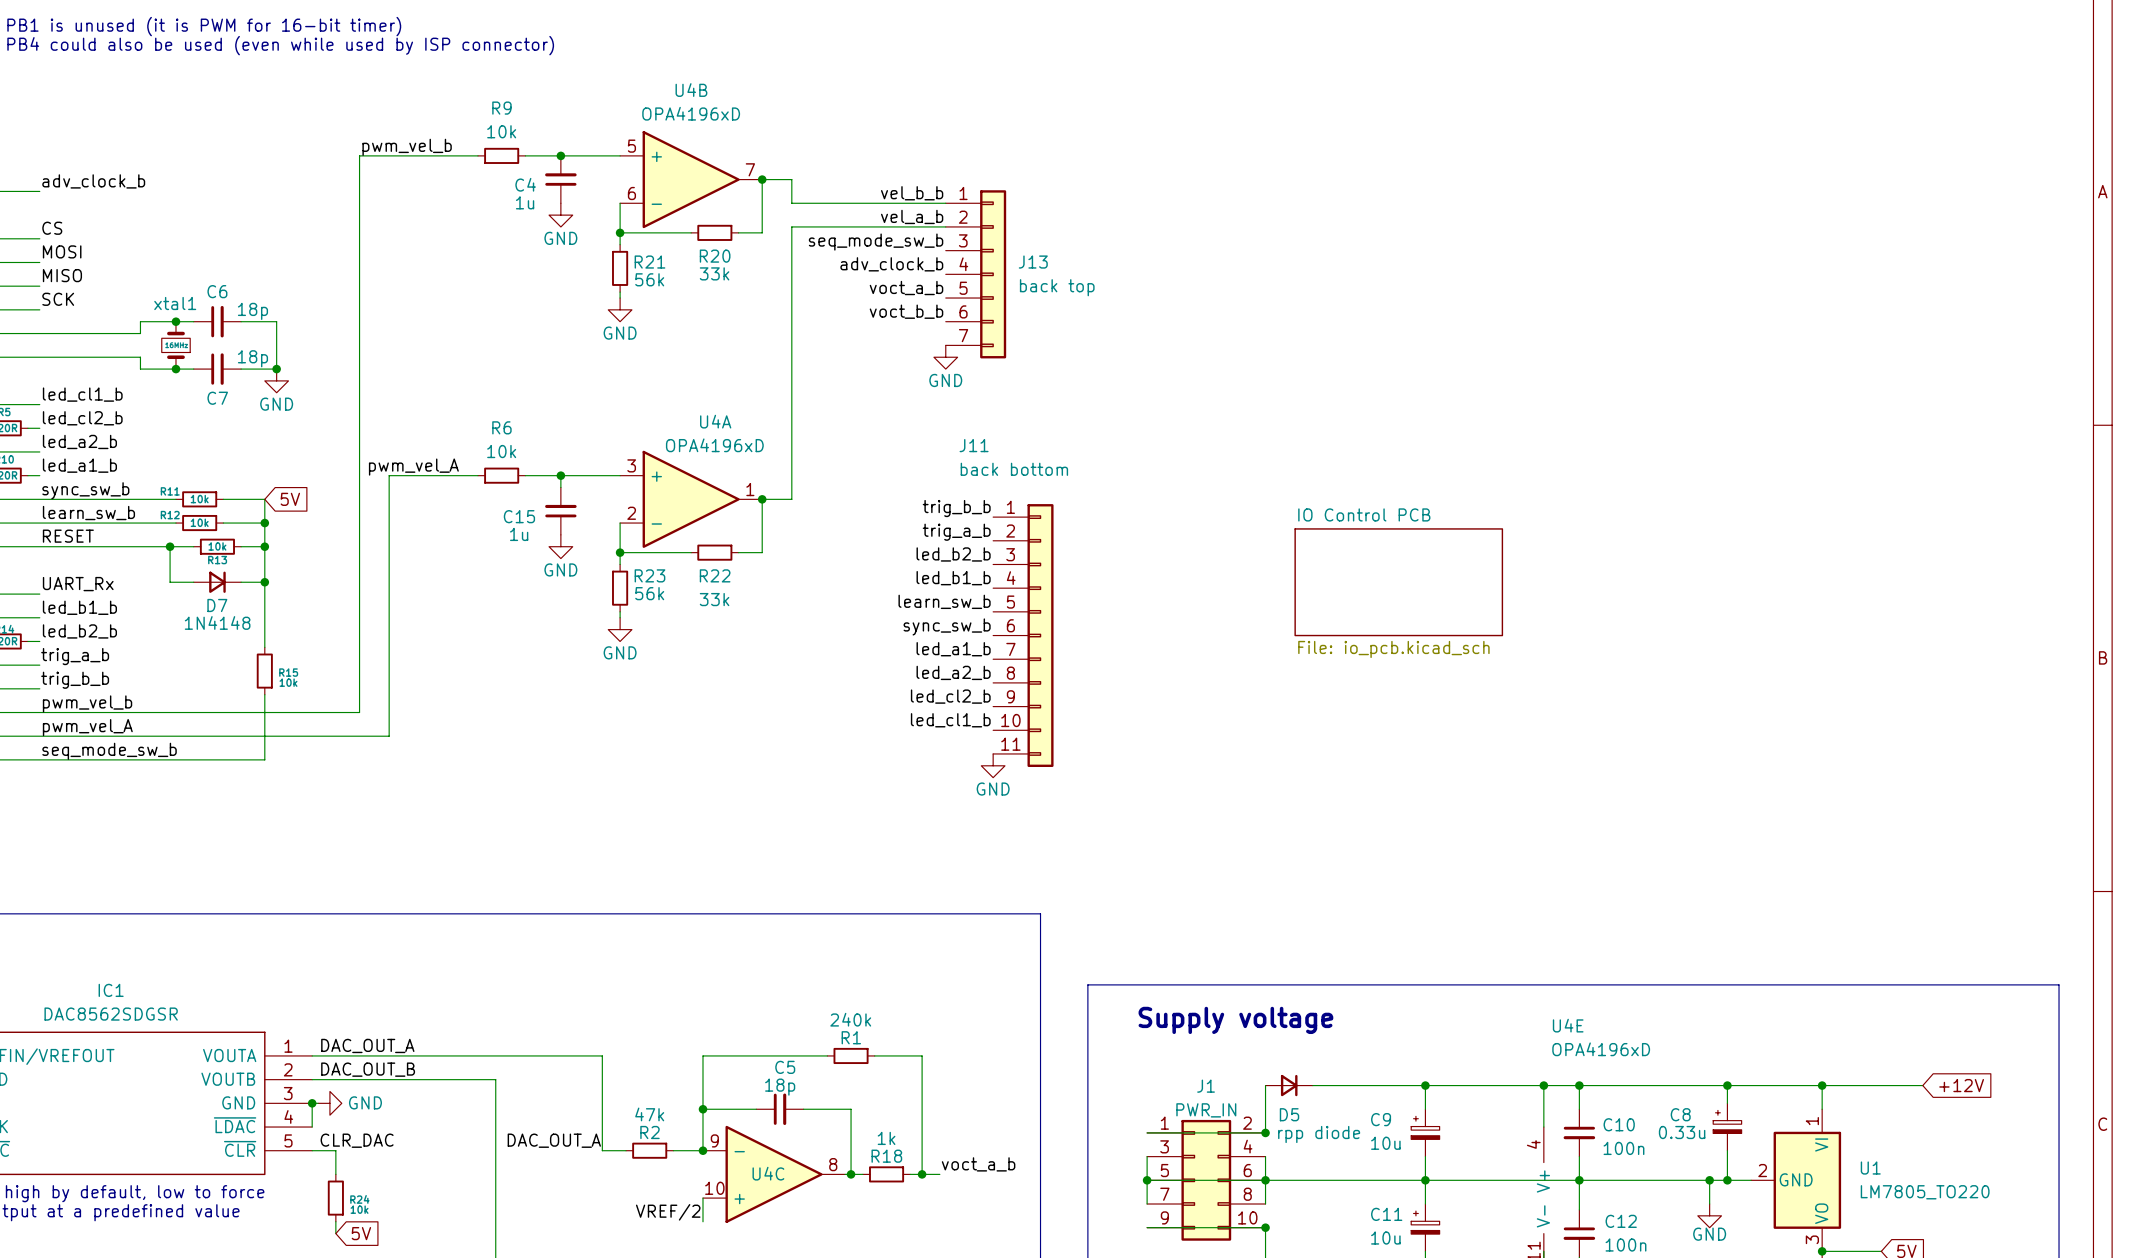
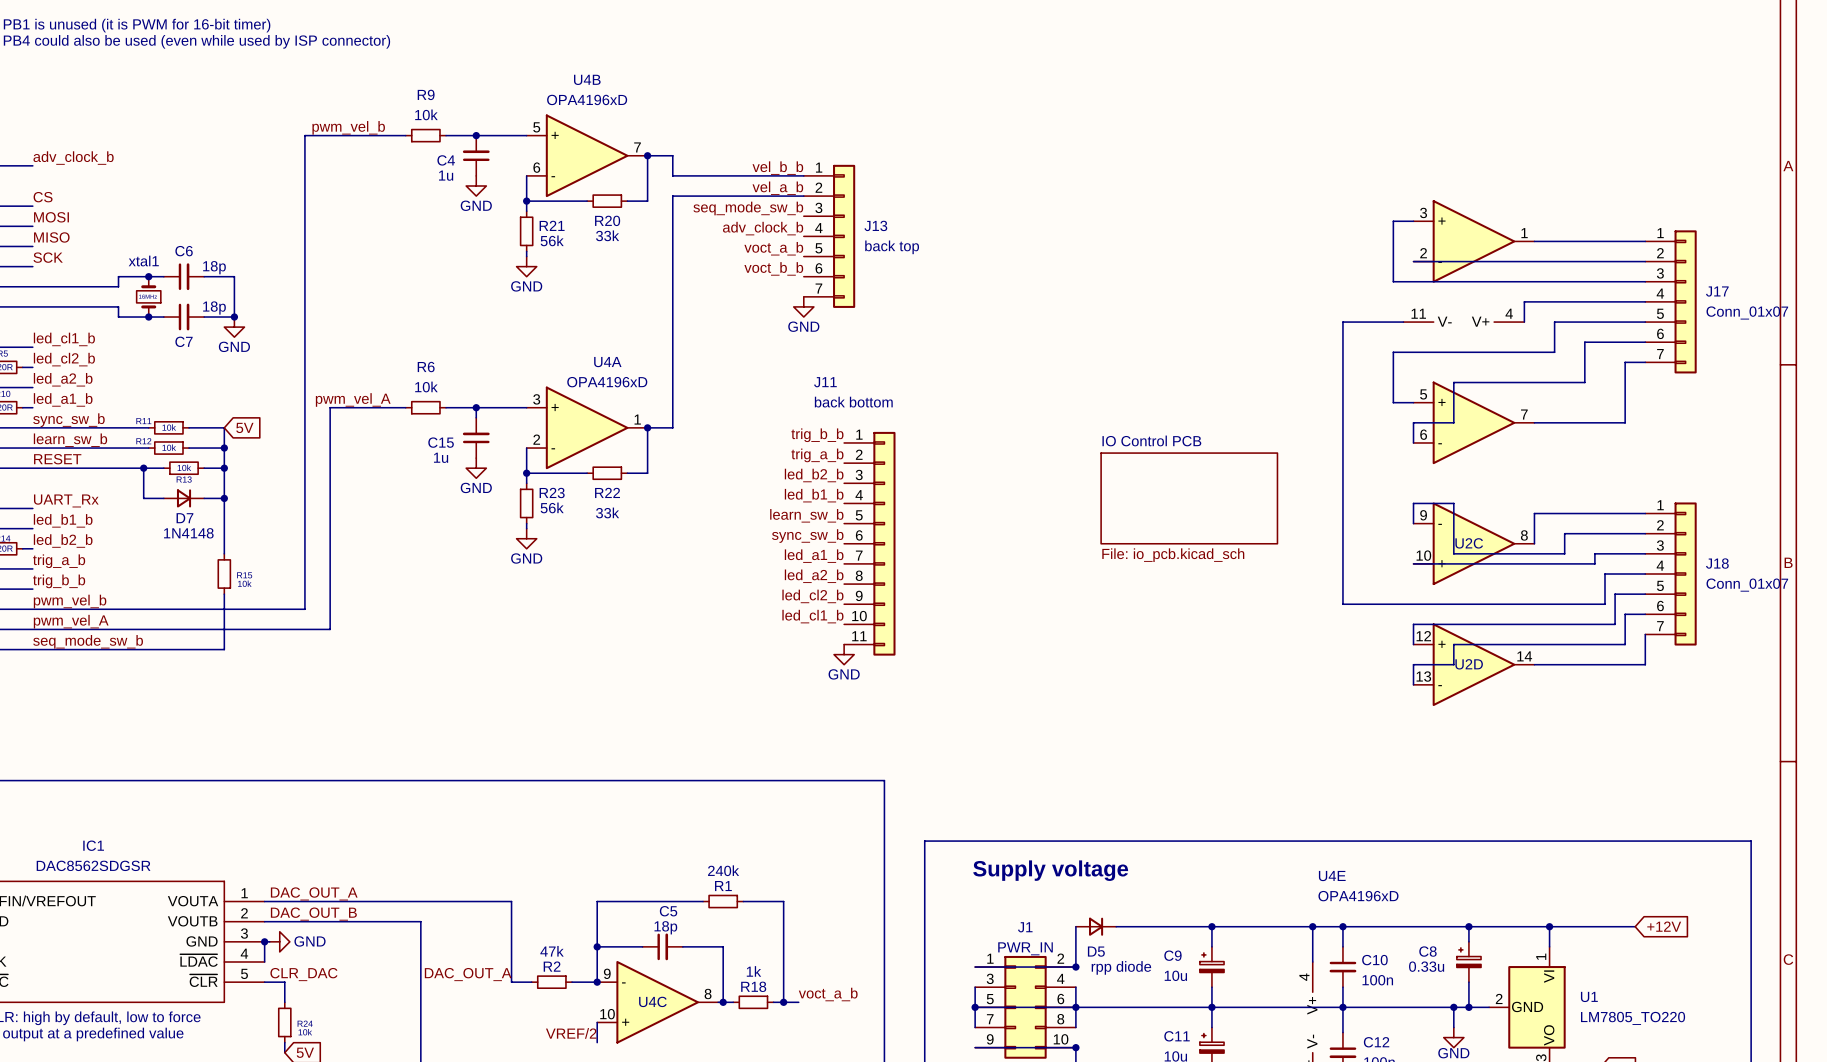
wire: none -> (1413, 221) (1393, 221) (1393, 281) (1645, 281)
part: none -> (1473, 241)
wire: none -> (1534, 241) (1645, 241)
wire: none -> (1413, 261) (1645, 261)
wire: none -> (1645, 301) (1524, 301) (1524, 322)
J17: none -> Conn_01x07 (1671, 301)
wire: none -> (1403, 322) (1342, 322) (1342, 604) (1604, 604) (1604, 574) (1645, 574)
part: none -> (1463, 322)
wire: none -> (1645, 322) (1554, 322) (1554, 352) (1393, 352) (1393, 402) (1413, 402)
wire: none -> (1645, 342) (1584, 342) (1584, 382) (1453, 382) (1453, 422) (1413, 422) (1413, 442)
wire: none -> (1645, 362) (1625, 362) (1625, 422) (1534, 422)
part: none -> (1473, 422)
wire: none -> (1645, 513) (1534, 513) (1534, 543)
wire: none -> (1413, 523) (1413, 503) (1453, 503) (1453, 553) (1564, 553) (1564, 533) (1645, 533)
U2C: none -> (1473, 543)
wire: none -> (1645, 553) (1594, 553) (1594, 563) (1413, 563)
J18: none -> Conn_01x07 (1671, 574)
wire: none -> (1645, 594) (1615, 594) (1615, 624) (1413, 624) (1413, 644)
wire: none -> (1645, 614) (1625, 614) (1625, 644) (1453, 644) (1453, 664) (1413, 664) (1413, 684)
wire: none -> (1645, 634) (1645, 664) (1534, 664)
U2D: none -> (1473, 664)

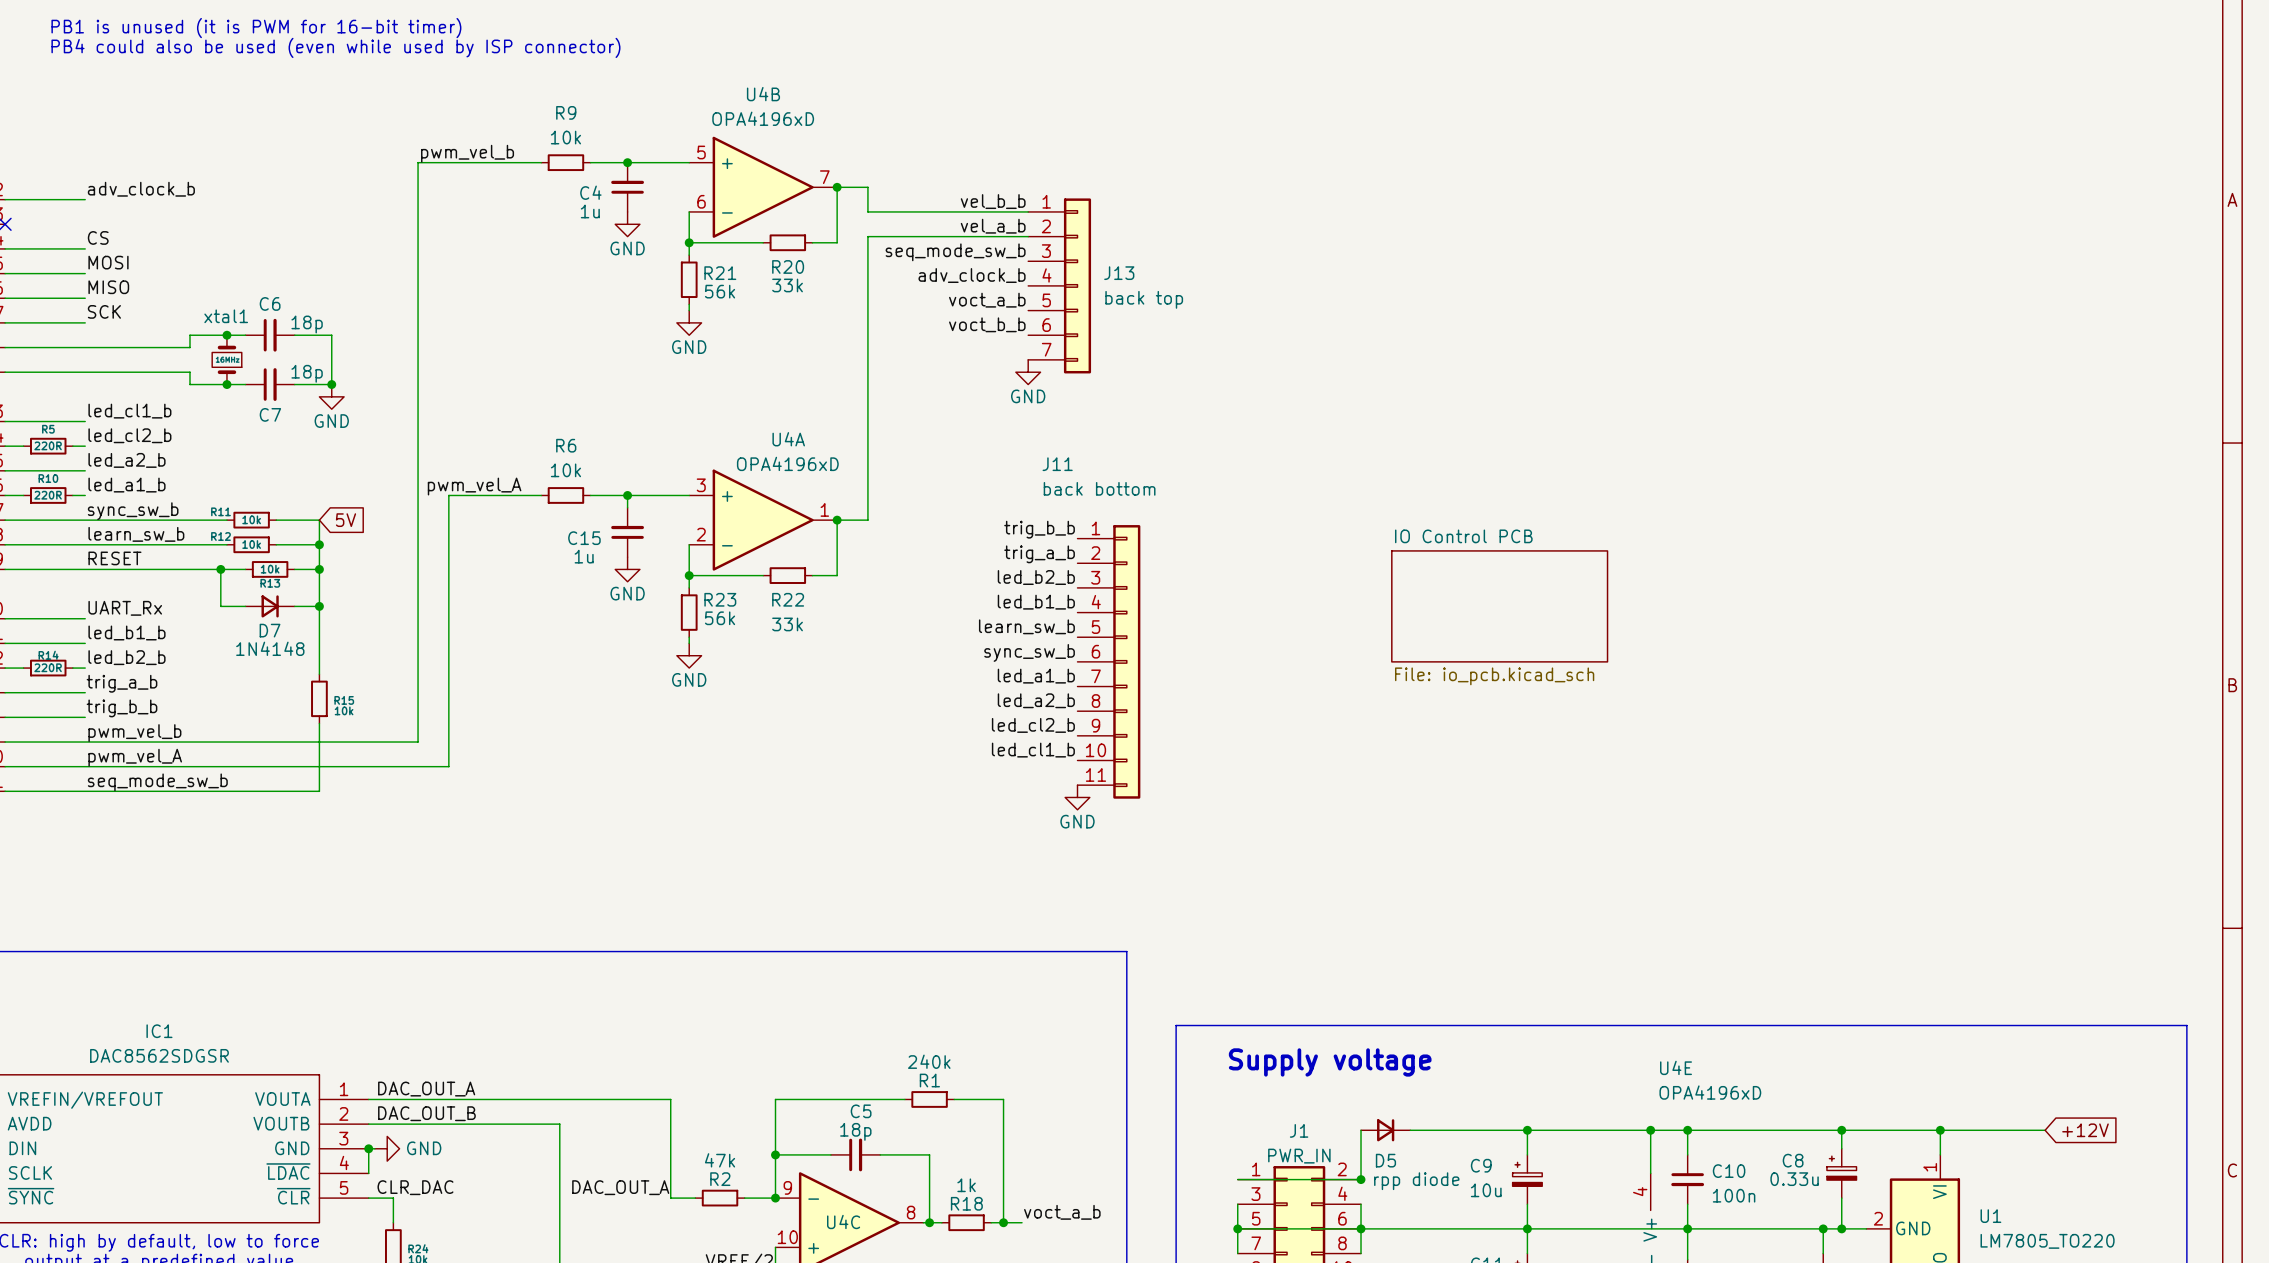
wire: (1413, 221) (1393, 221) (1393, 281) (1645, 281) -> none
part: (1473, 241) -> none
wire: (1534, 241) (1645, 241) -> none
wire: (1413, 261) (1645, 261) -> none
wire: (1645, 301) (1524, 301) (1524, 322) -> none
J17: Conn_01x07 (1671, 301) -> none
wire: (1403, 322) (1342, 322) (1342, 604) (1604, 604) (1604, 574) (1645, 574) -> none
part: (1463, 322) -> none
wire: (1645, 322) (1554, 322) (1554, 352) (1393, 352) (1393, 402) (1413, 402) -> none
wire: (1645, 342) (1584, 342) (1584, 382) (1453, 382) (1453, 422) (1413, 422) (1413, 442) -> none
wire: (1645, 362) (1625, 362) (1625, 422) (1534, 422) -> none
part: (1473, 422) -> none
wire: (1645, 513) (1534, 513) (1534, 543) -> none
wire: (1413, 523) (1413, 503) (1453, 503) (1453, 553) (1564, 553) (1564, 533) (1645, 533) -> none
U2C: (1473, 543) -> none
wire: (1645, 553) (1594, 553) (1594, 563) (1413, 563) -> none
J18: Conn_01x07 (1671, 574) -> none
wire: (1645, 594) (1615, 594) (1615, 624) (1413, 624) (1413, 644) -> none
wire: (1645, 614) (1625, 614) (1625, 644) (1453, 644) (1453, 664) (1413, 664) (1413, 684) -> none
wire: (1645, 634) (1645, 664) (1534, 664) -> none
U2D: (1473, 664) -> none

